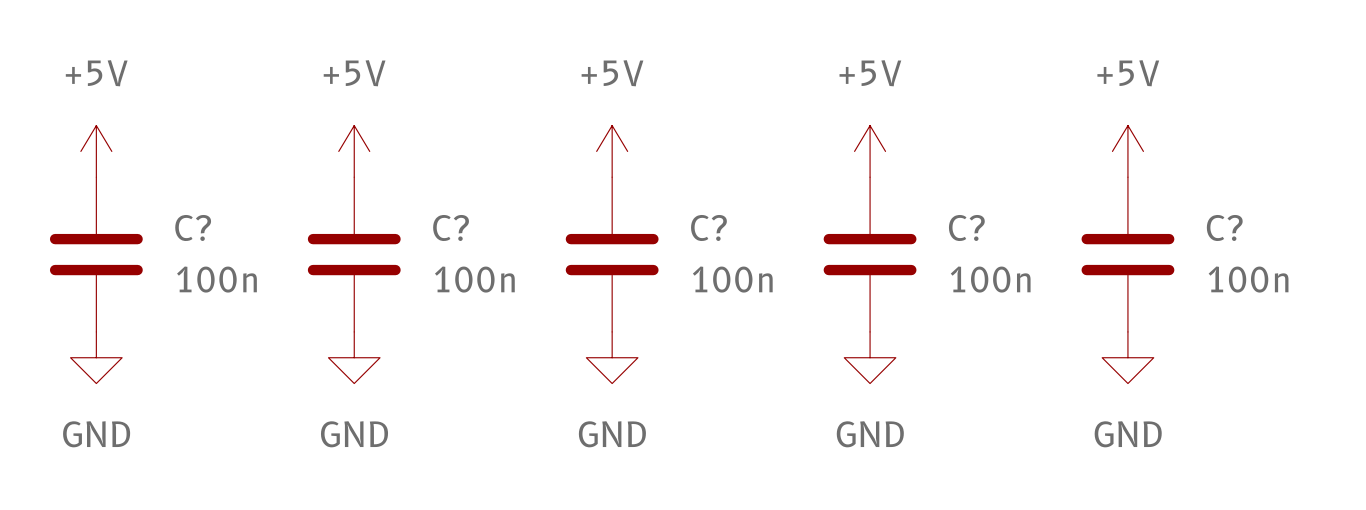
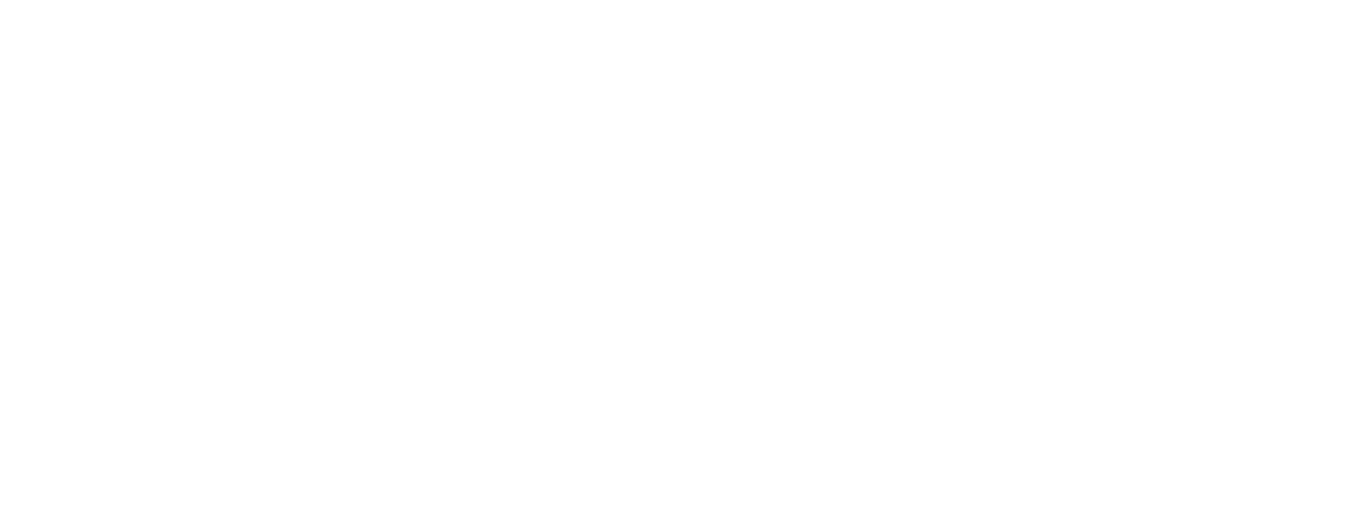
power symbol: +5V (96, 151) -> none
power symbol: +5V (354, 151) -> none
power symbol: +5V (612, 151) -> none
power symbol: +5V (870, 151) -> none
power symbol: +5V (1127, 151) -> none
C?: 100n (96, 254) -> none
C?: 100n (354, 254) -> none
C?: 100n (612, 254) -> none
C?: 100n (870, 254) -> none
C?: 100n (1127, 254) -> none
power symbol: GND (96, 357) -> none
power symbol: GND (354, 357) -> none
power symbol: GND (612, 357) -> none
power symbol: GND (870, 357) -> none
power symbol: GND (1127, 357) -> none

